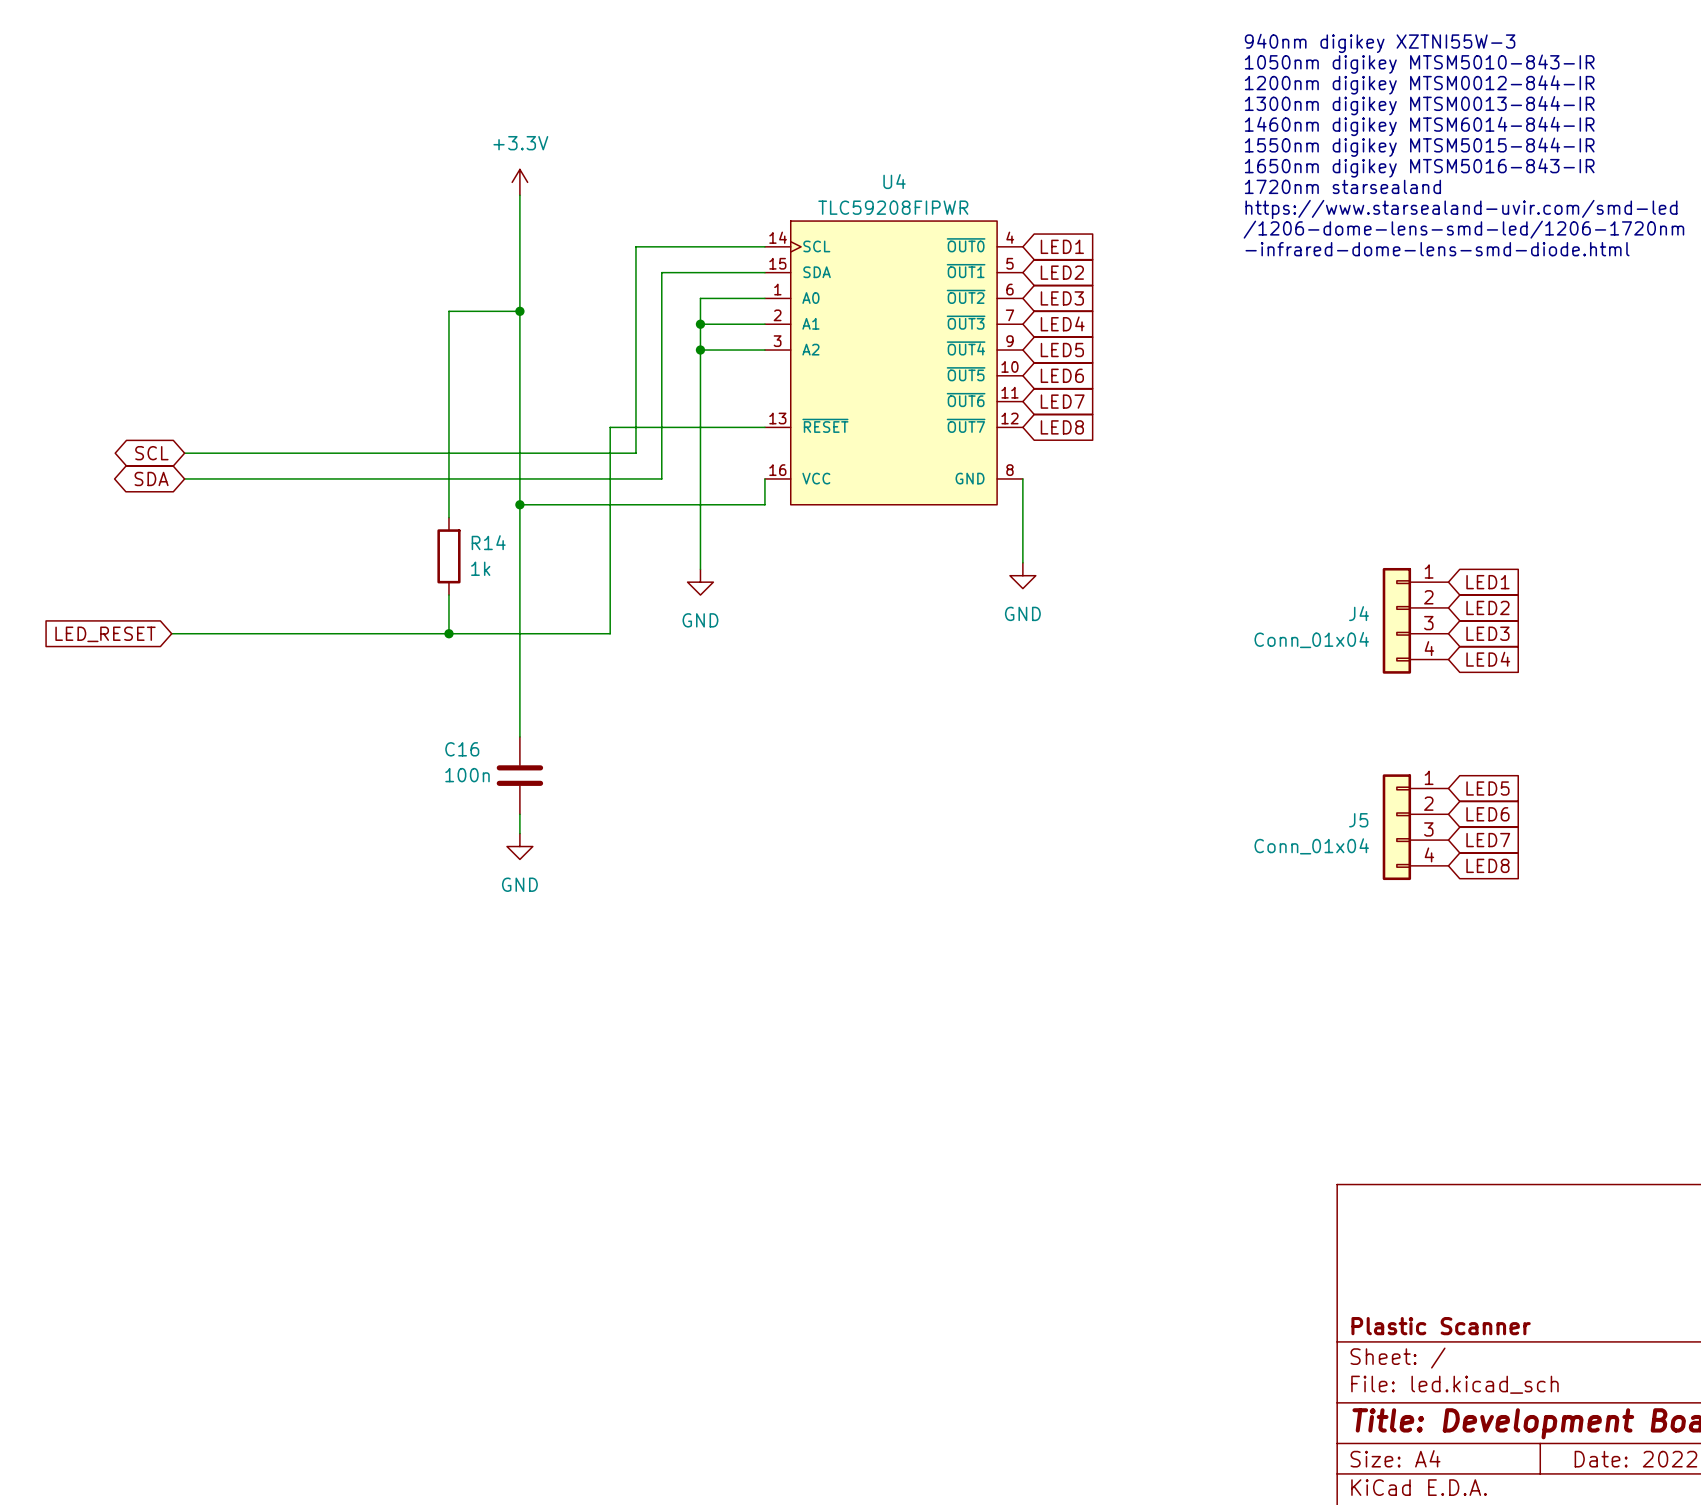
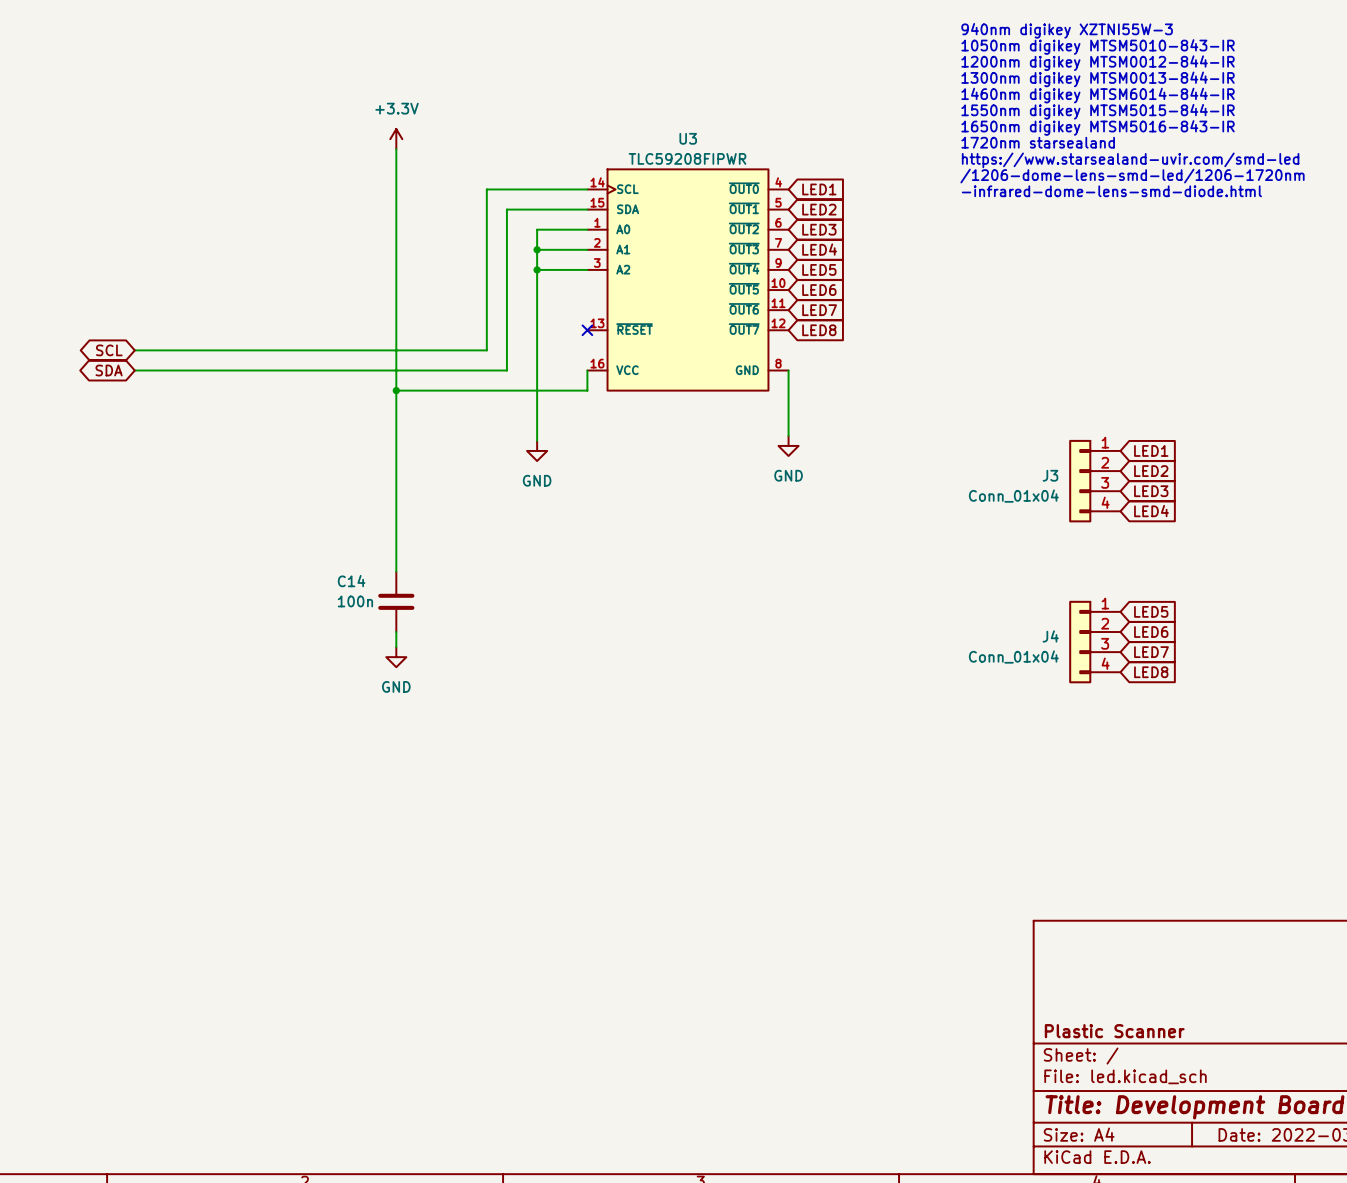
U4 name: U4 (894, 181) -> U3 (688, 138)
wire: (519, 311) (448, 311) (448, 517) -> none
junction: (519, 311) -> none
wire: (764, 427) (610, 427) (610, 633) (171, 633) -> none
no-connect mark: none -> (587, 330)
R14: 1k (448, 556) -> none
wire: (448, 595) (448, 633) -> none
J4 name: J4 (1359, 613) -> J3 (1050, 475)
junction: (448, 633) -> none
global label: LED_RESET (105, 634) -> none
C16 name: C16 (462, 749) -> C14 (351, 581)
J5 name: J5 (1358, 820) -> J4 (1050, 636)

